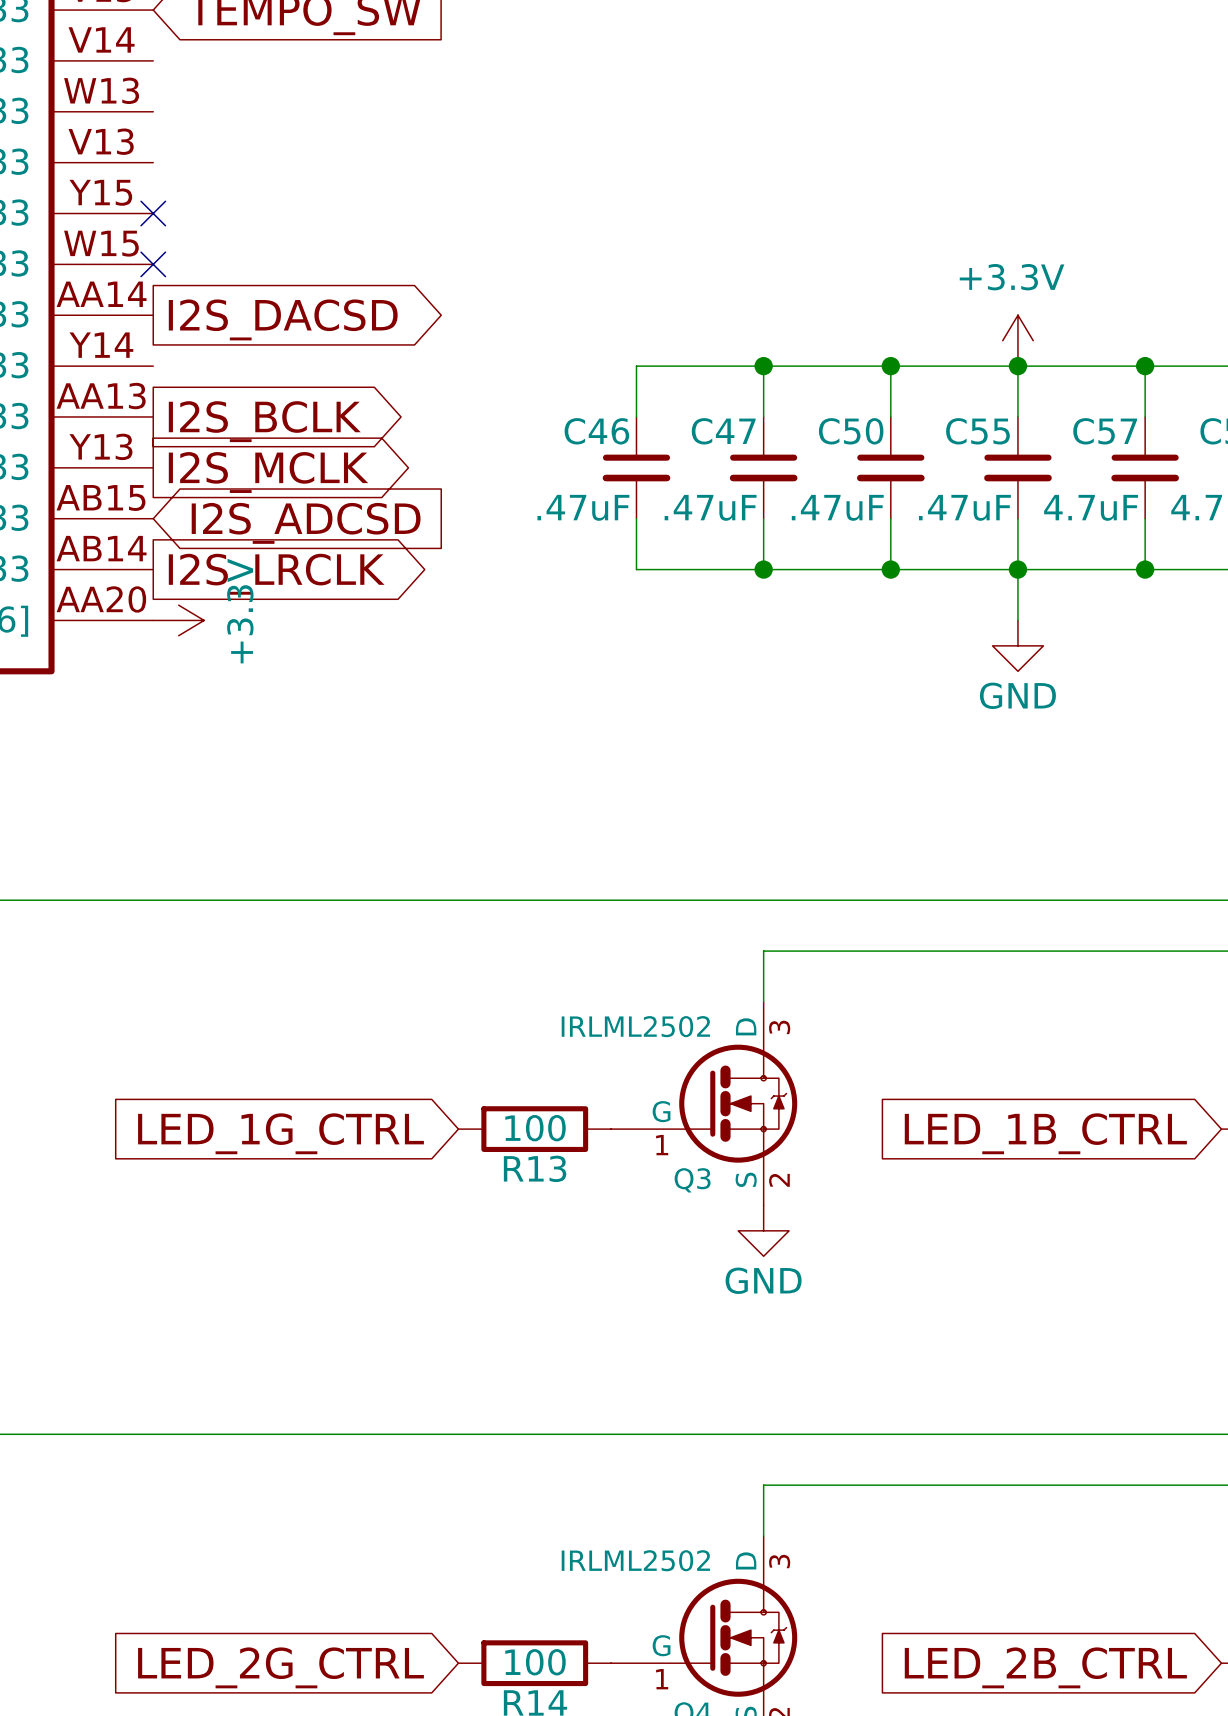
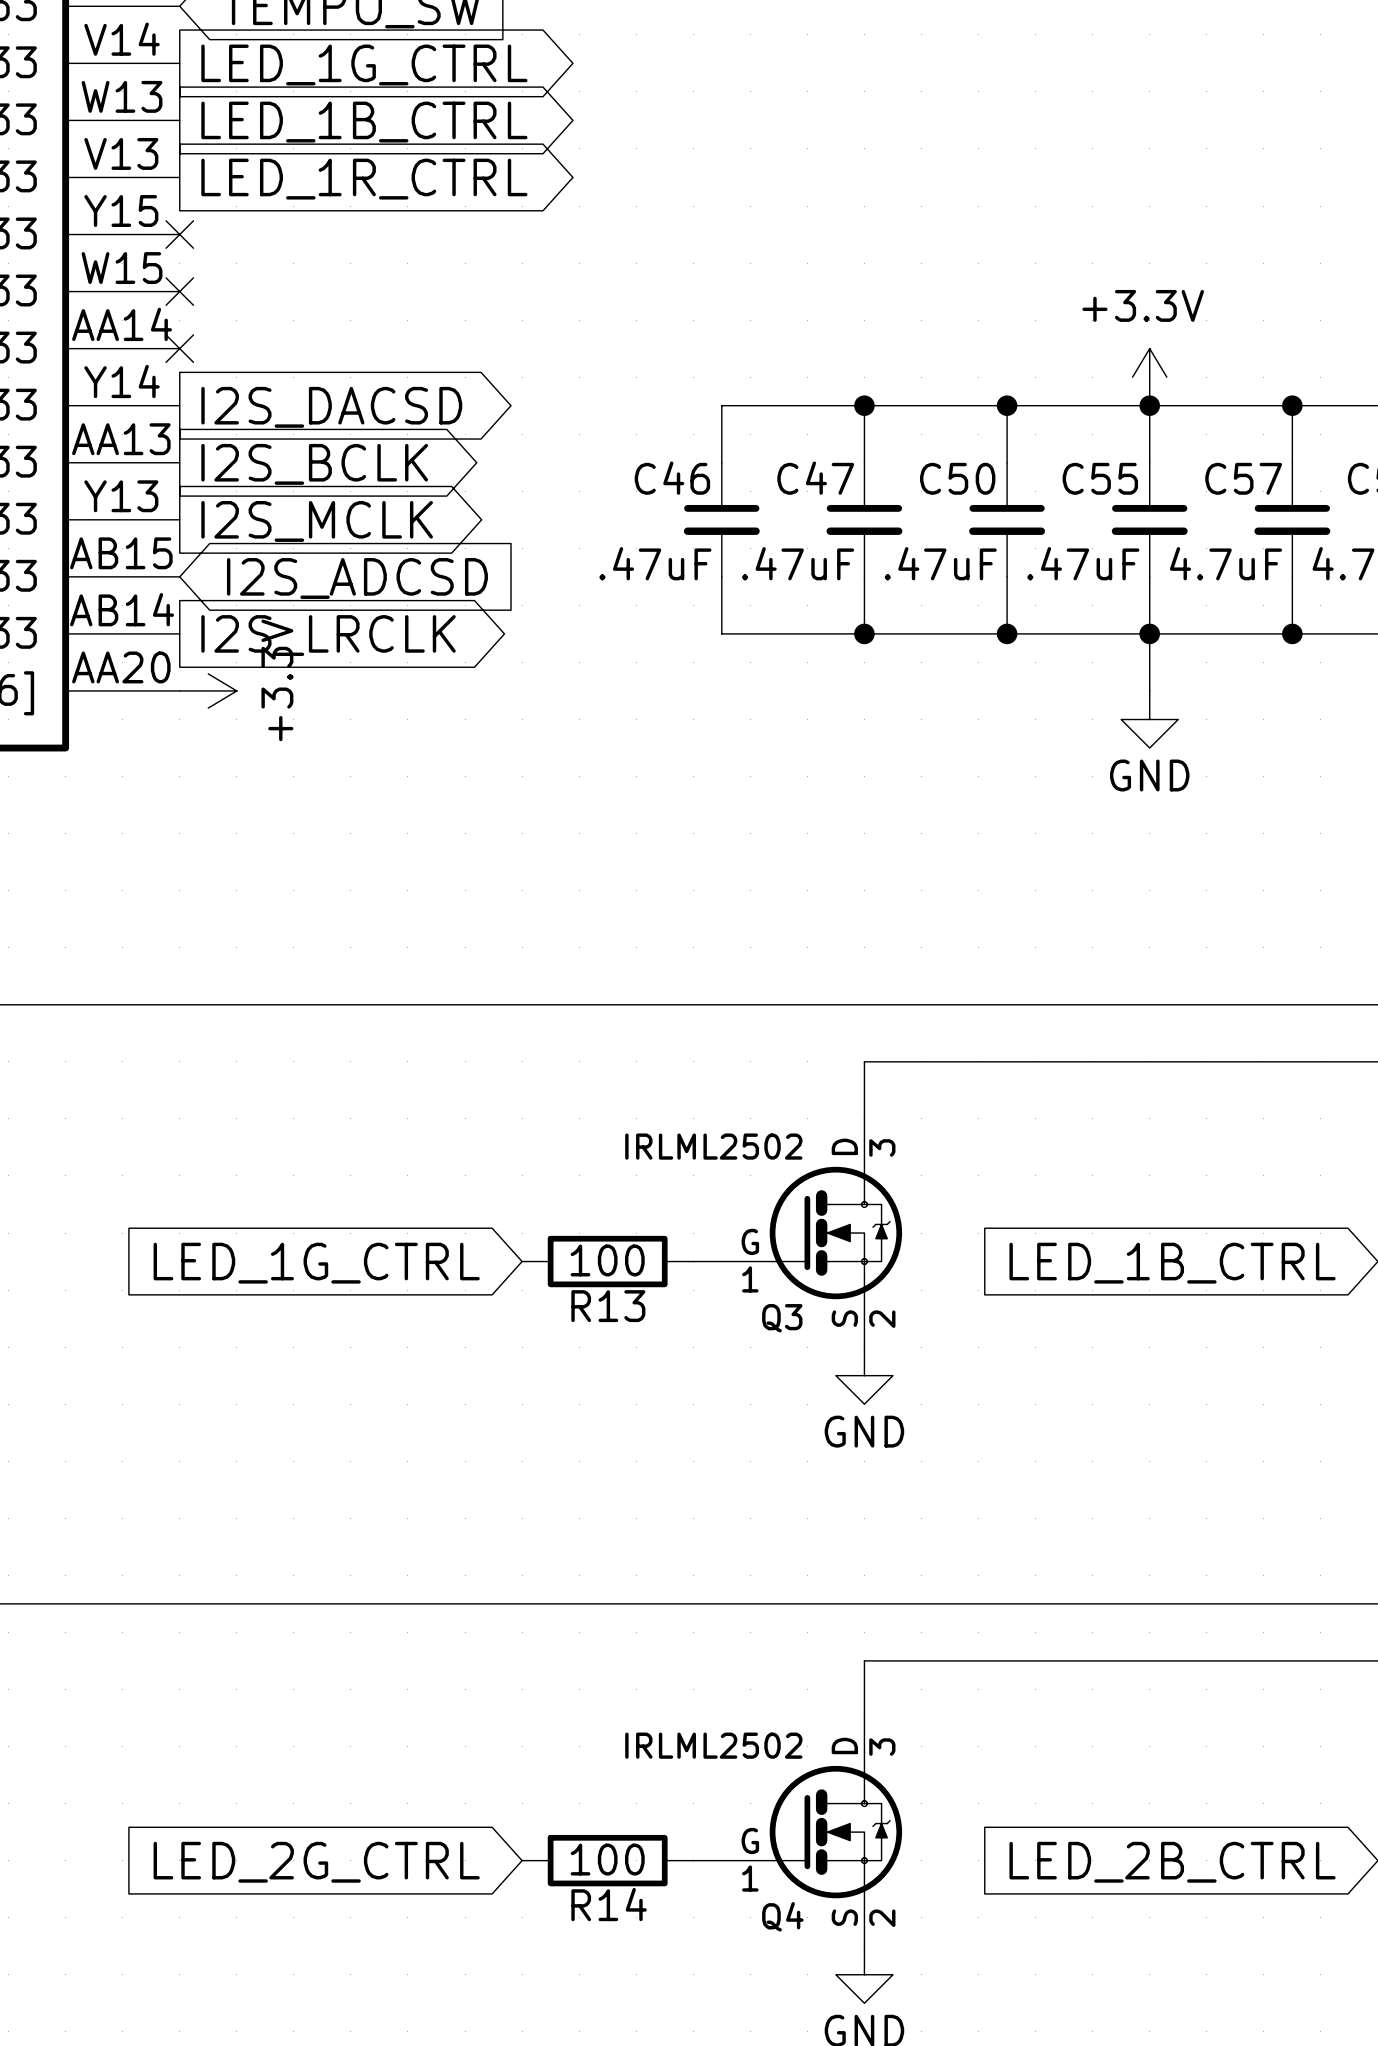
global label: none -> LED_1G_CTRL (364, 64)
global label: none -> LED_1B_CTRL (364, 122)
global label: none -> LED_1R_CTRL (364, 179)
no-connect mark: none -> (179, 348)
global label position: I2S_DACSD (283, 319) -> I2S_DACSD (331, 407)

